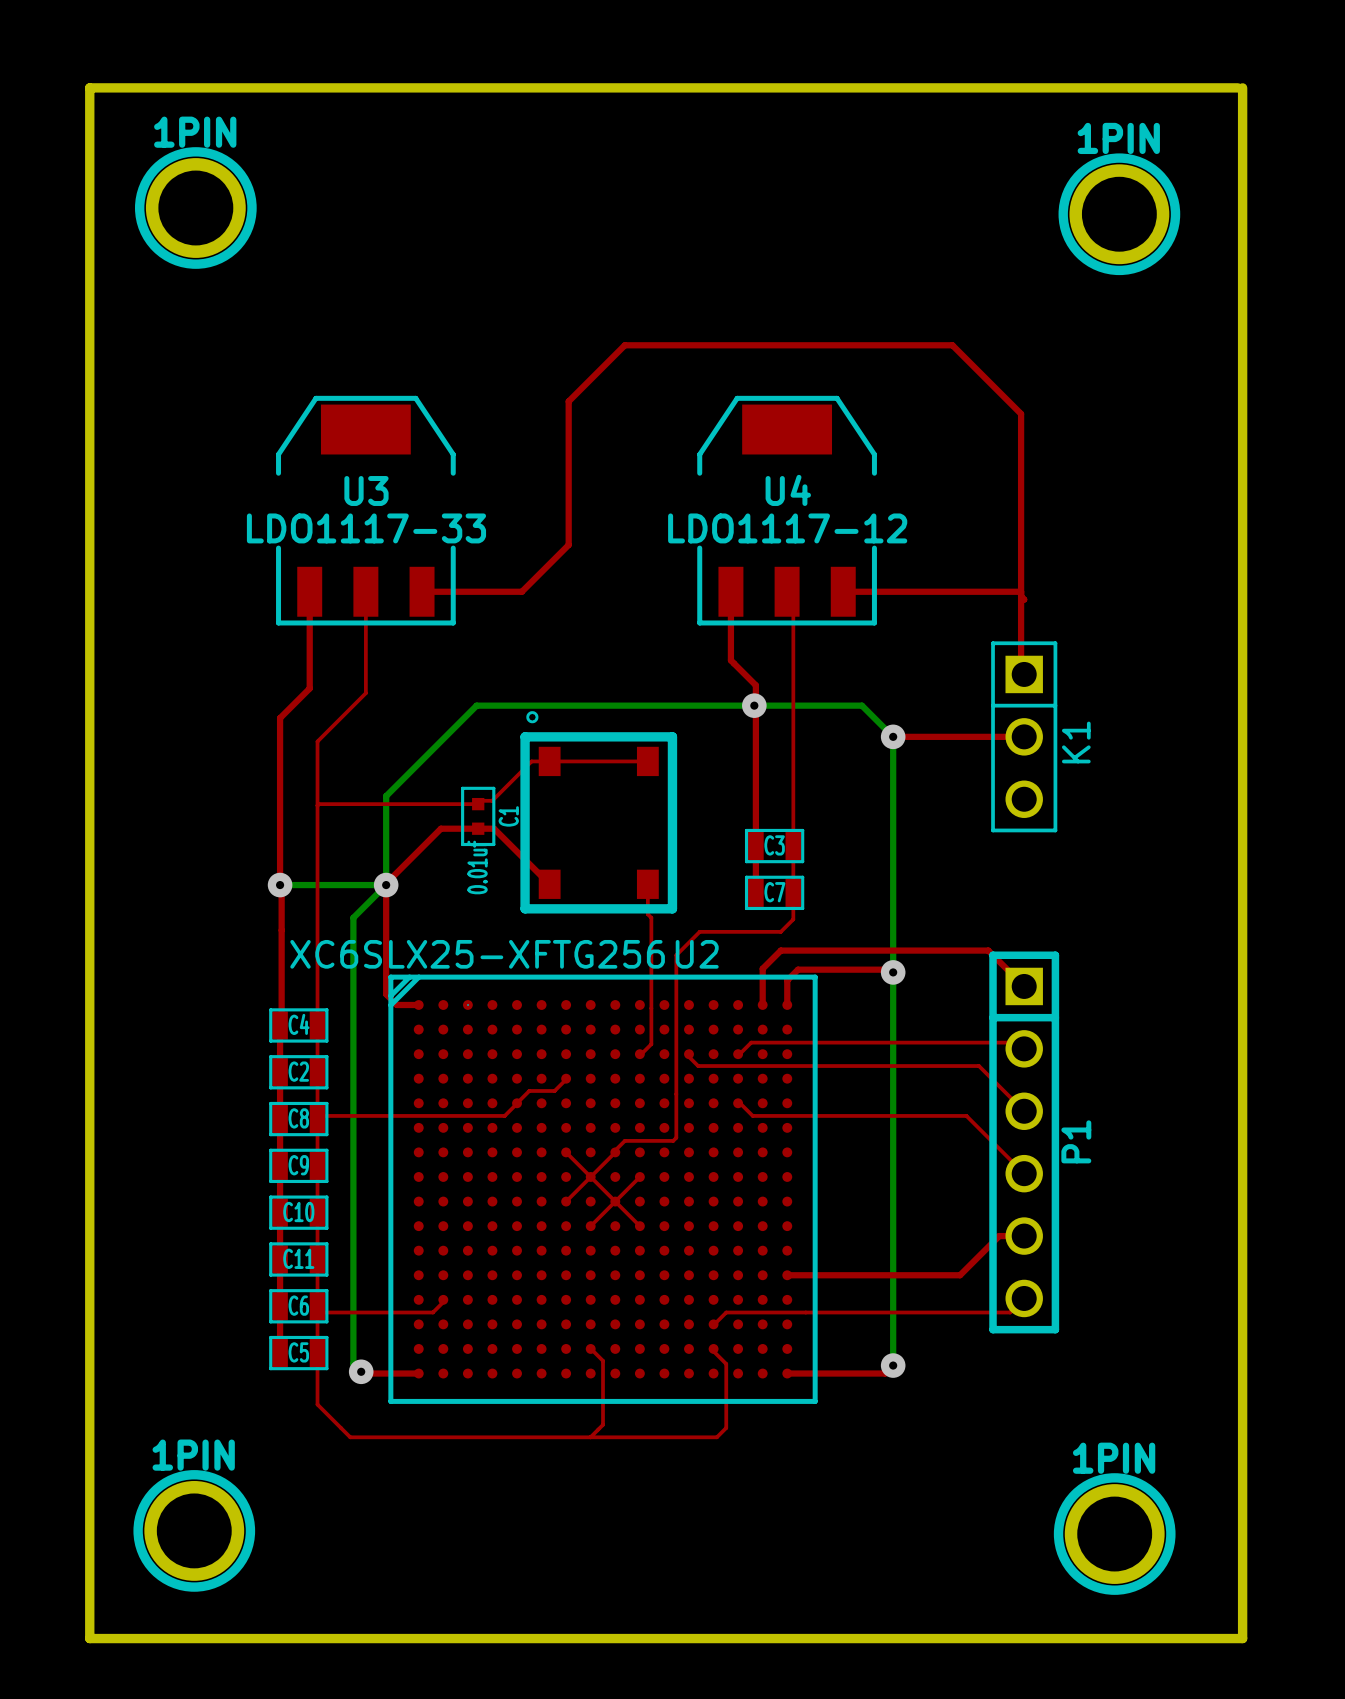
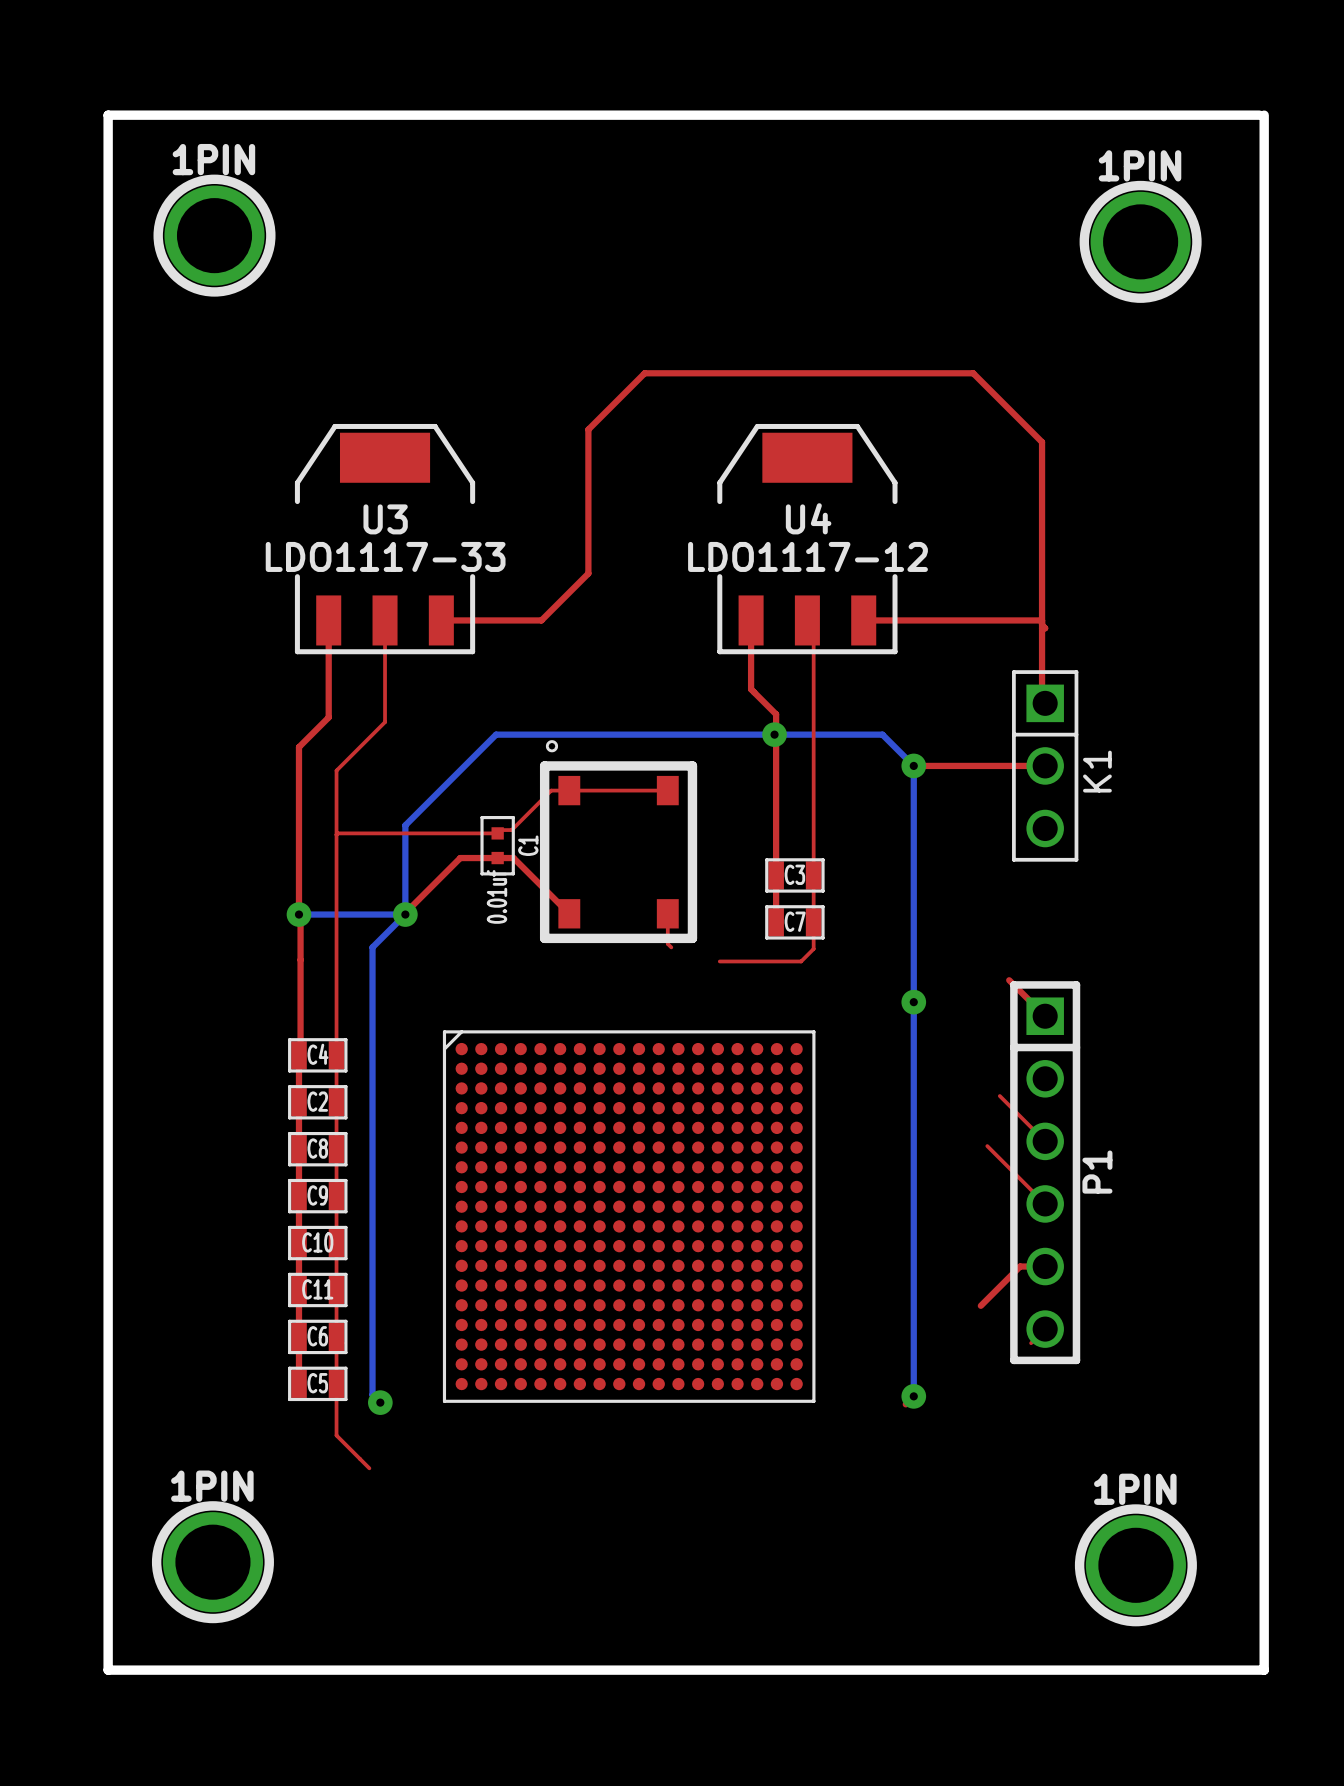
top track: (386, 885) (386, 994) (396, 1004) (418, 1004) -> none
top track: (651, 917) (651, 1044) (639, 1054) -> none
top track: (699, 931) (676, 955) (676, 1137) (673, 1140) (624, 1140) (566, 1201) -> none
top track: (988, 950) (780, 950) (762, 968) (762, 1004) -> none
top track: (890, 969) (798, 969) (787, 980) (787, 1004) -> none
top track: (1017, 1042) (751, 1042) (738, 1054) -> none
top track: (689, 1054) (689, 1056) (698, 1066) (978, 1066) -> none
top track: (566, 1078) (554, 1090) (529, 1090) (517, 1103) -> none
top track: (517, 1103) (504, 1115) (320, 1115) -> none
top track: (738, 1103) (752, 1115) (966, 1115) -> none
top track: (566, 1152) (639, 1226) -> none
top track: (639, 1176) (590, 1226) -> none
part: none -> (629, 1216)
U2: XC6SLX25-XFTG256 (603, 1189) -> none
top track: (787, 1275) (960, 1275) -> none
top track: (443, 1299) (432, 1312) (323, 1312) -> none
top track: (1010, 1312) (726, 1312) (713, 1324) -> none
top track: (591, 1348) (603, 1360) (603, 1424) (590, 1437) -> none
top track: (713, 1348) (713, 1351) (726, 1363) (726, 1427) (716, 1437) (350, 1437) -> none
top track: (362, 1373) (418, 1373) -> none
top track: (787, 1373) (885, 1373) -> none

